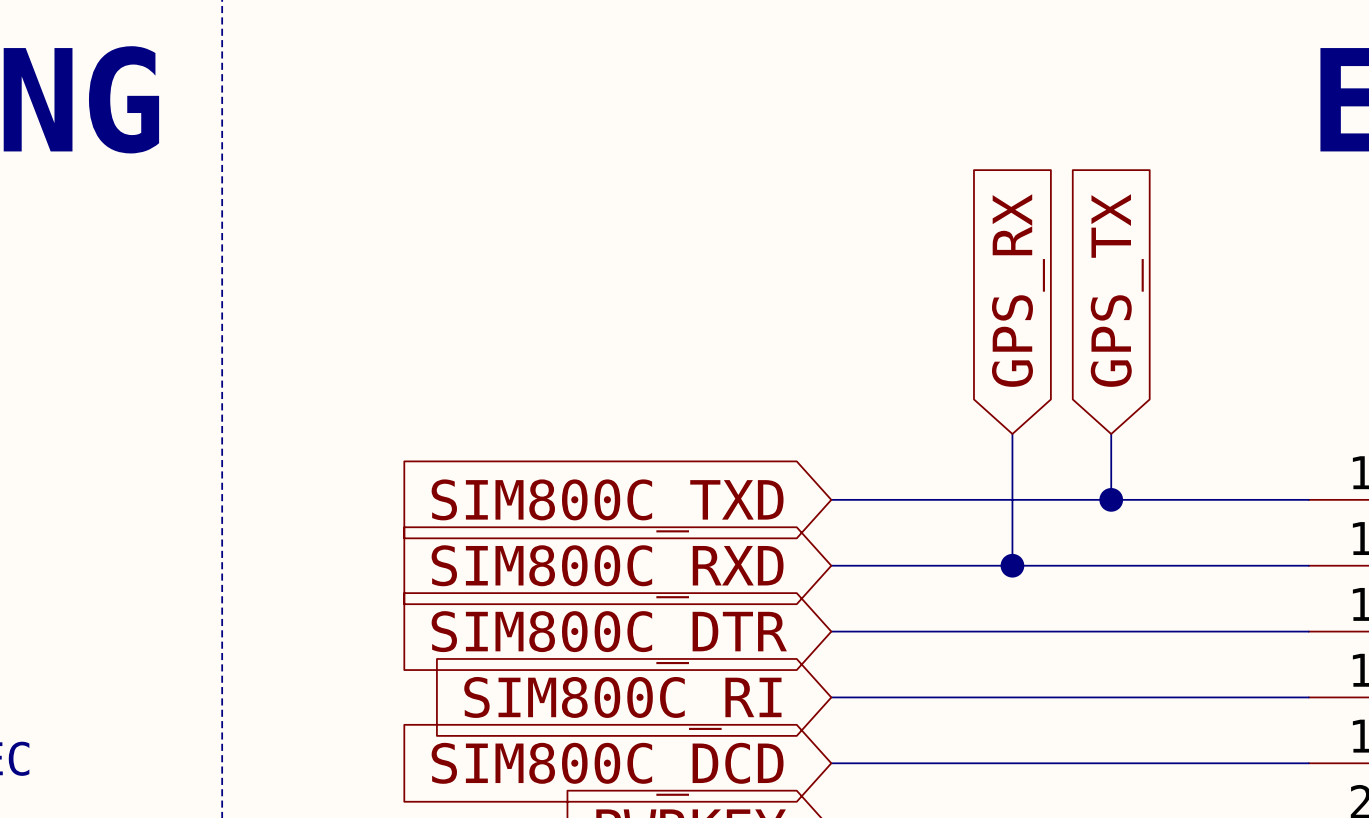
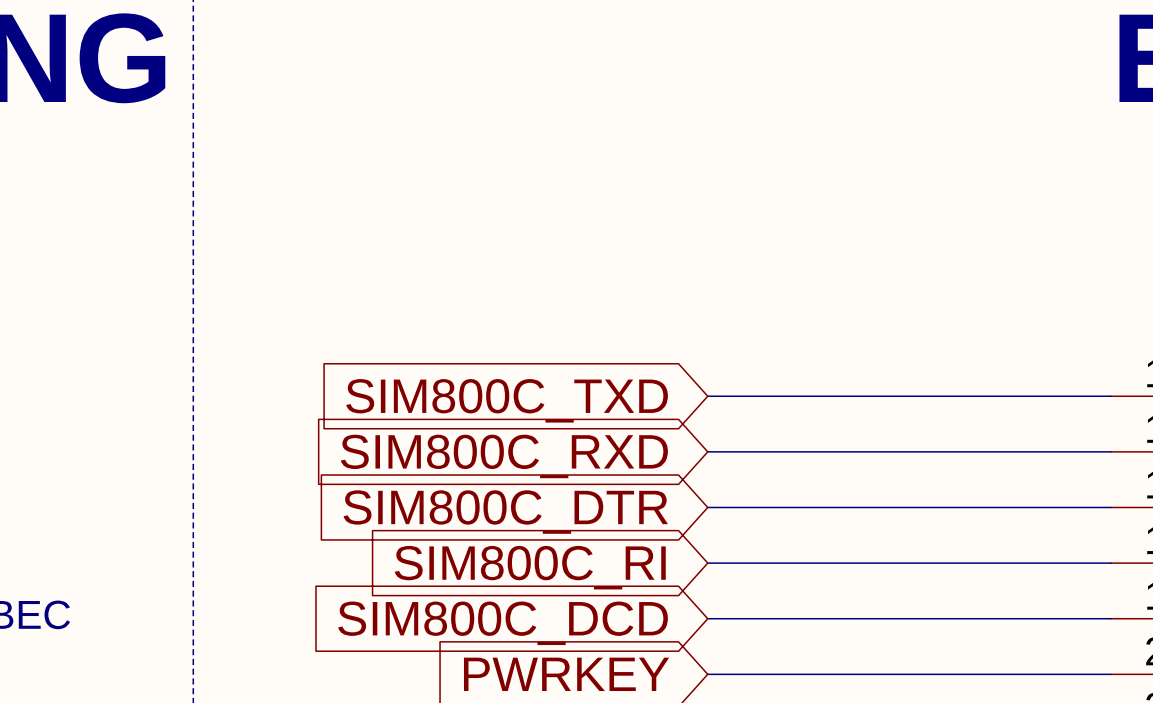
global label: GPS_RX (1018, 290) -> none
global label: GPS_TX (1117, 290) -> none
wire: (1012, 434) (1012, 565) -> none
wire: (1111, 434) (1111, 499) -> none
junction: (1111, 499) -> none
junction: (1012, 565) -> none

